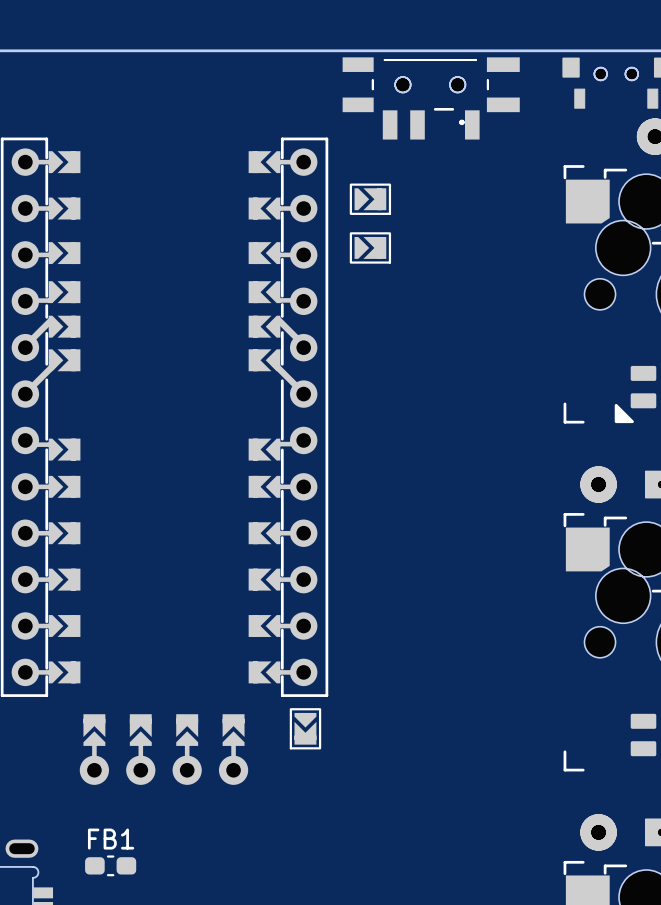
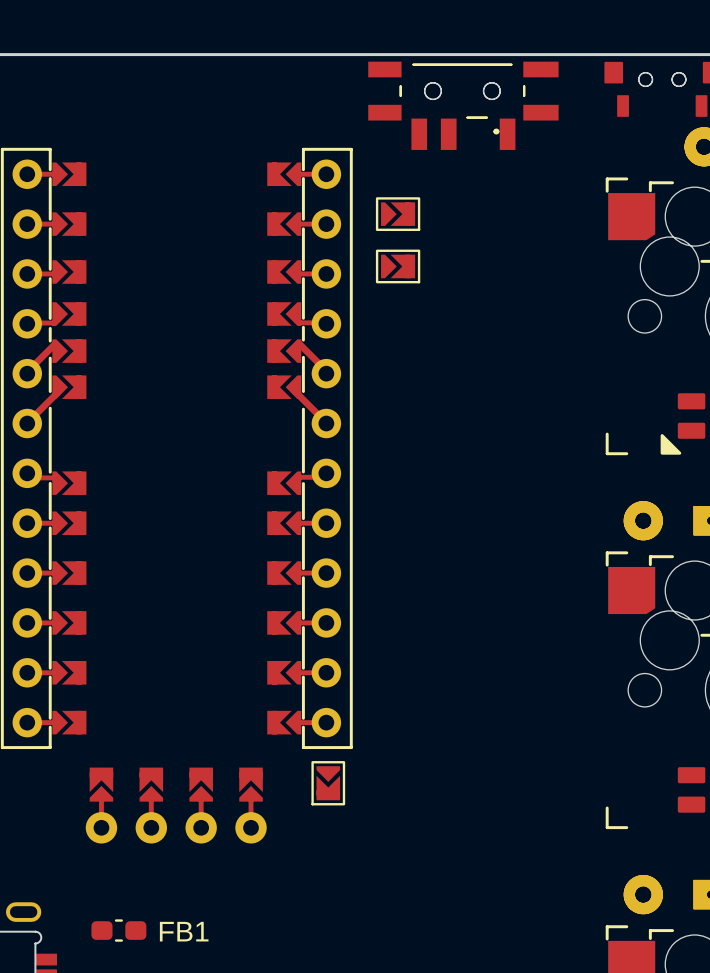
FB1 name position: FB1 (111, 839) -> FB1 (184, 931)

